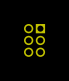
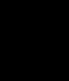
part: (34, 40) -> none

